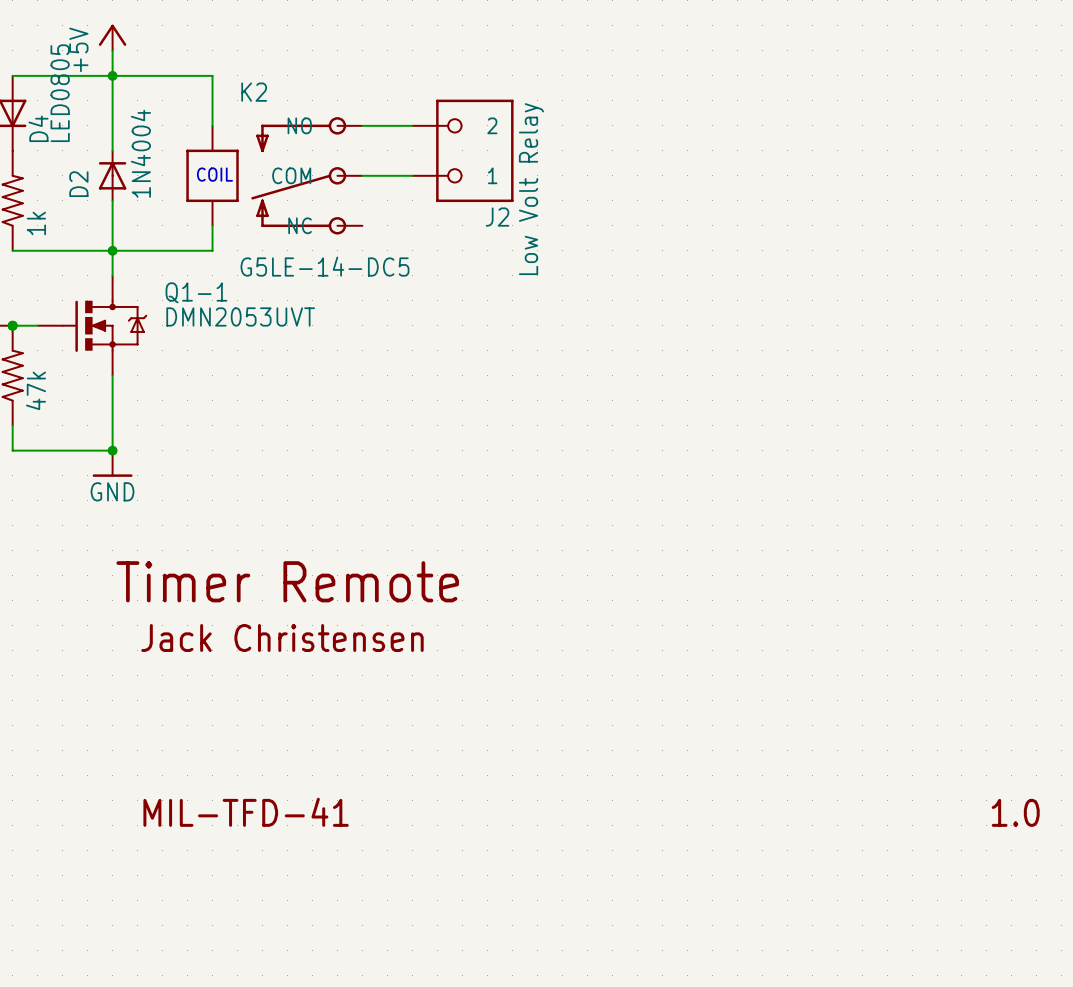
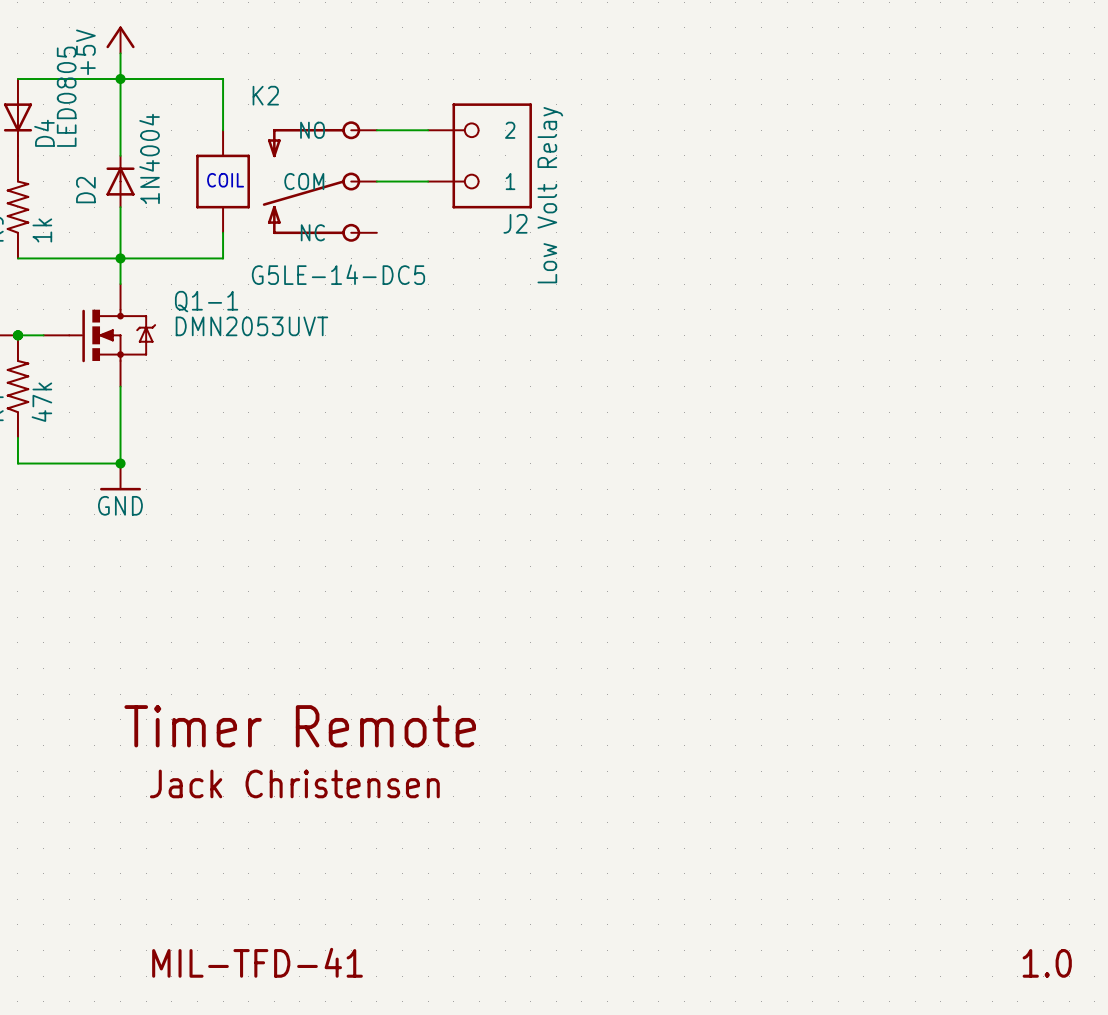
text position: Timer Remote (287, 581) -> Timer Remote (300, 726)
text position: Jack Christensen (282, 637) -> Jack Christensen (294, 783)
text position: MIL-TFD-41 (246, 812) -> MIL-TFD-41 (257, 962)
text position: 1.0 (1015, 812) -> 1.0 (1047, 963)

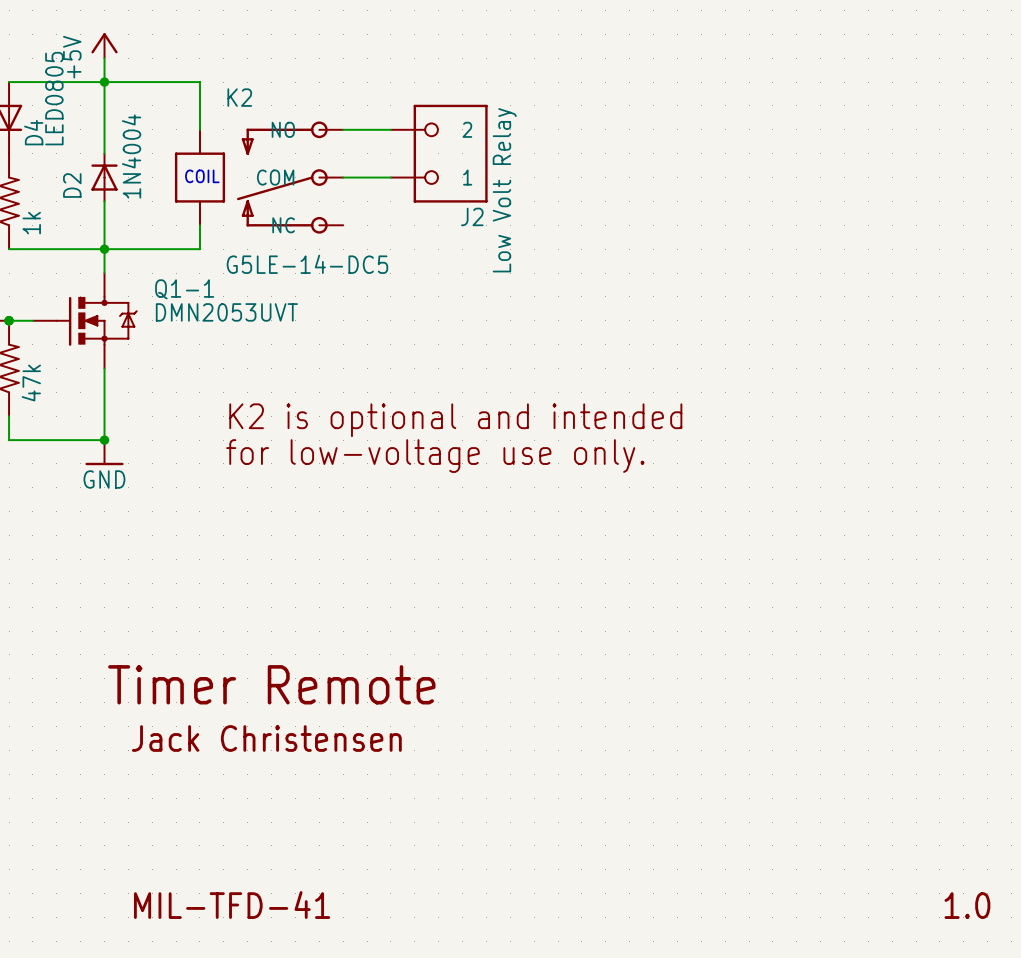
text: none -> K2 is optional and intended (455, 420)
text: none -> for low-voltage use only. (435, 456)

